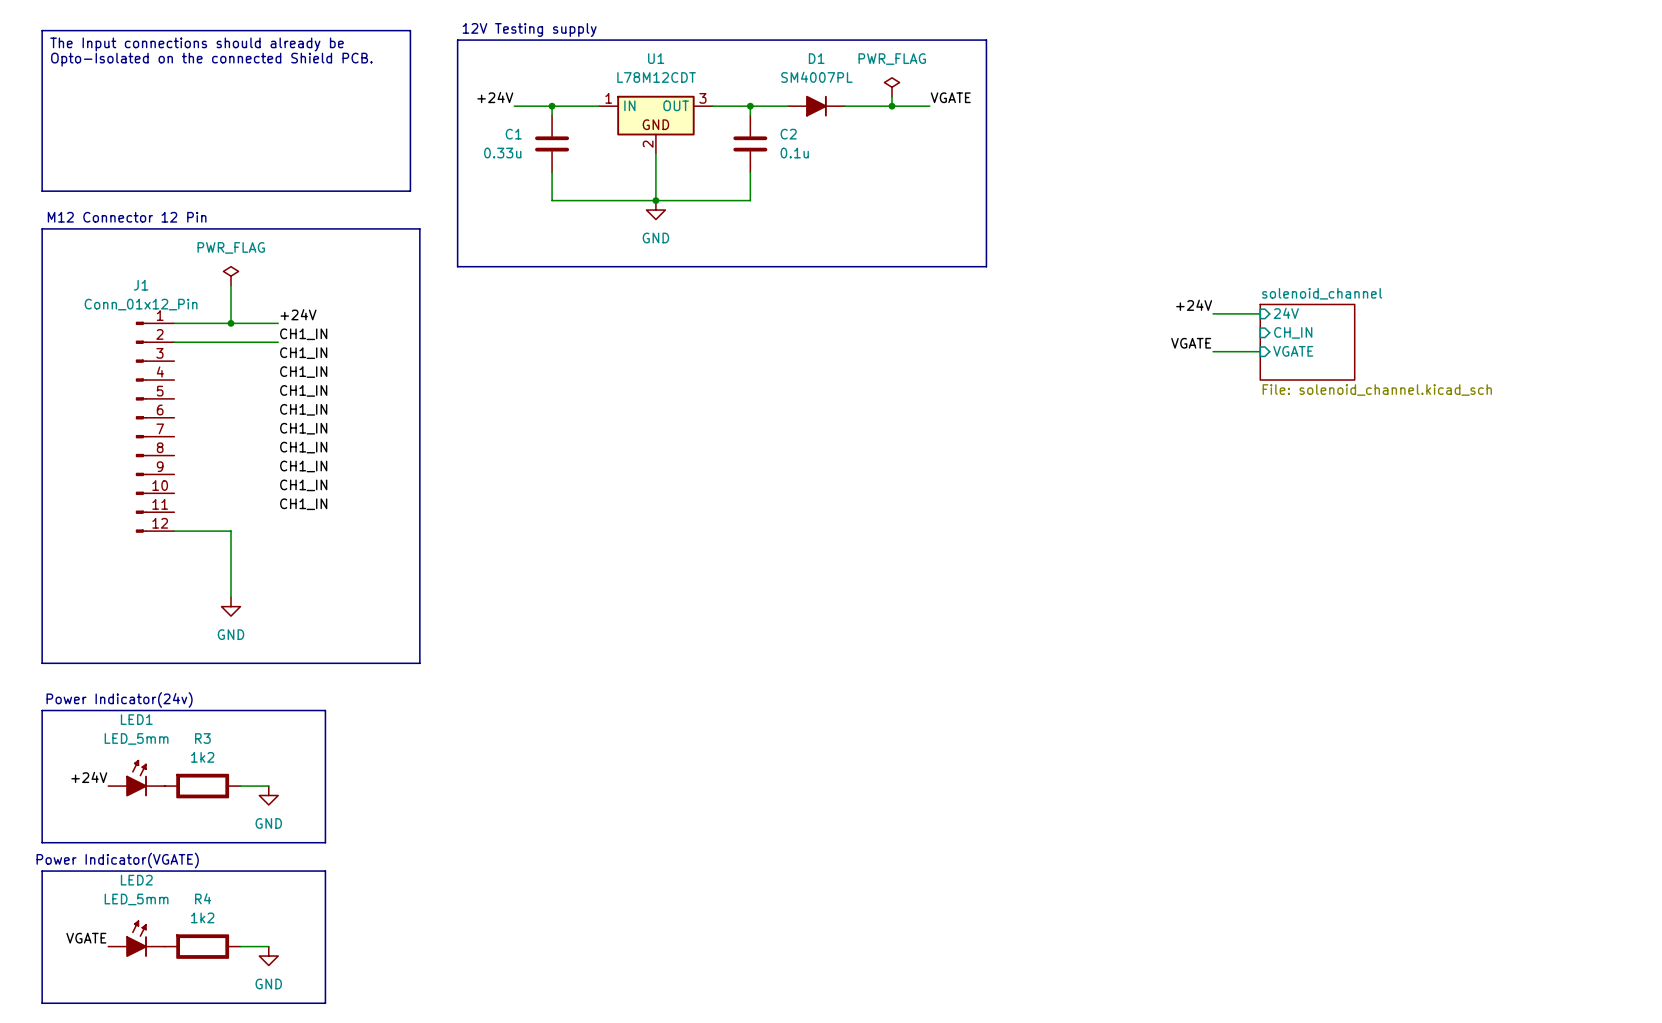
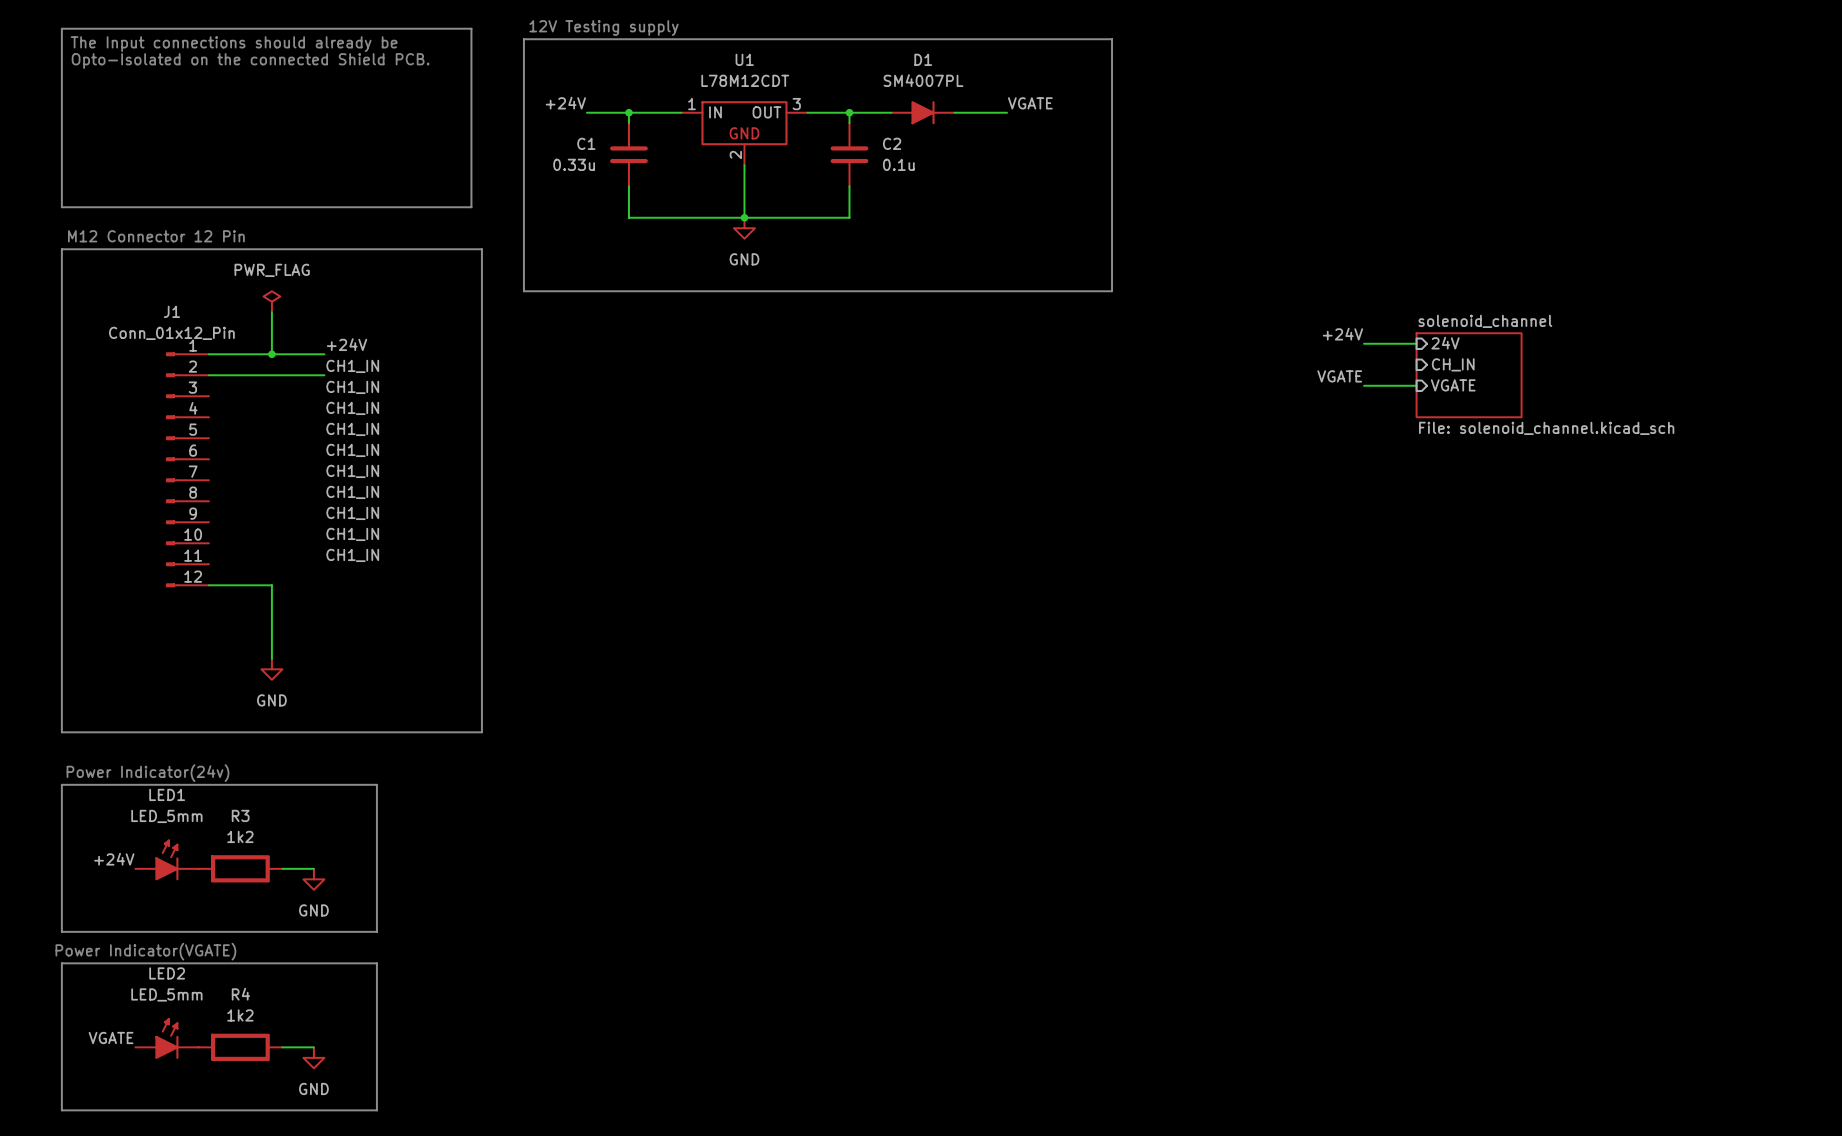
power symbol: PWR_FLAG (892, 87) -> none
wire: (892, 96) (892, 106) (929, 106) -> none
label position: VGATE (950, 97) -> VGATE (1030, 103)
junction: (892, 106) -> none

